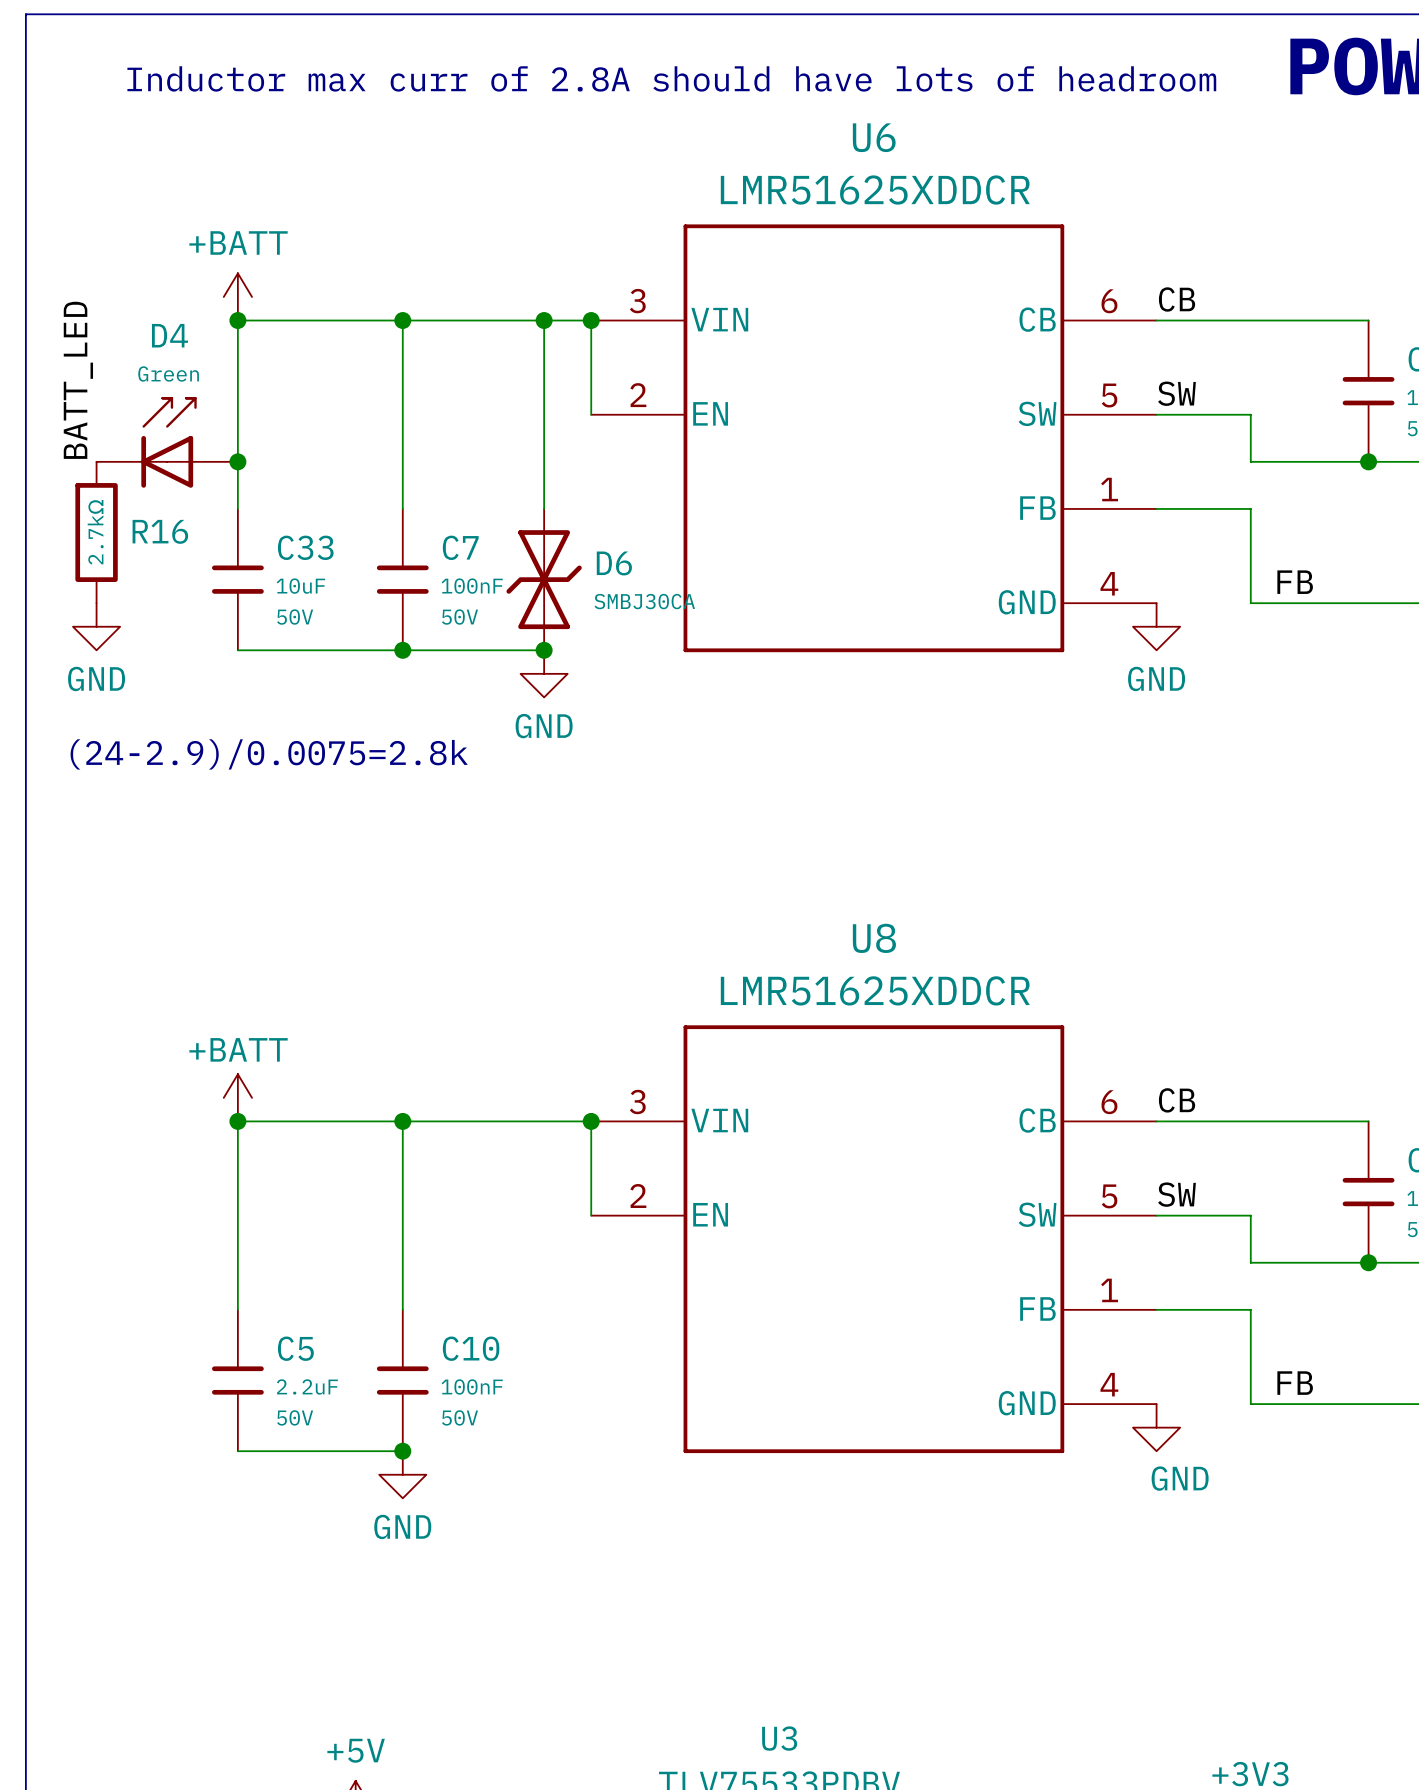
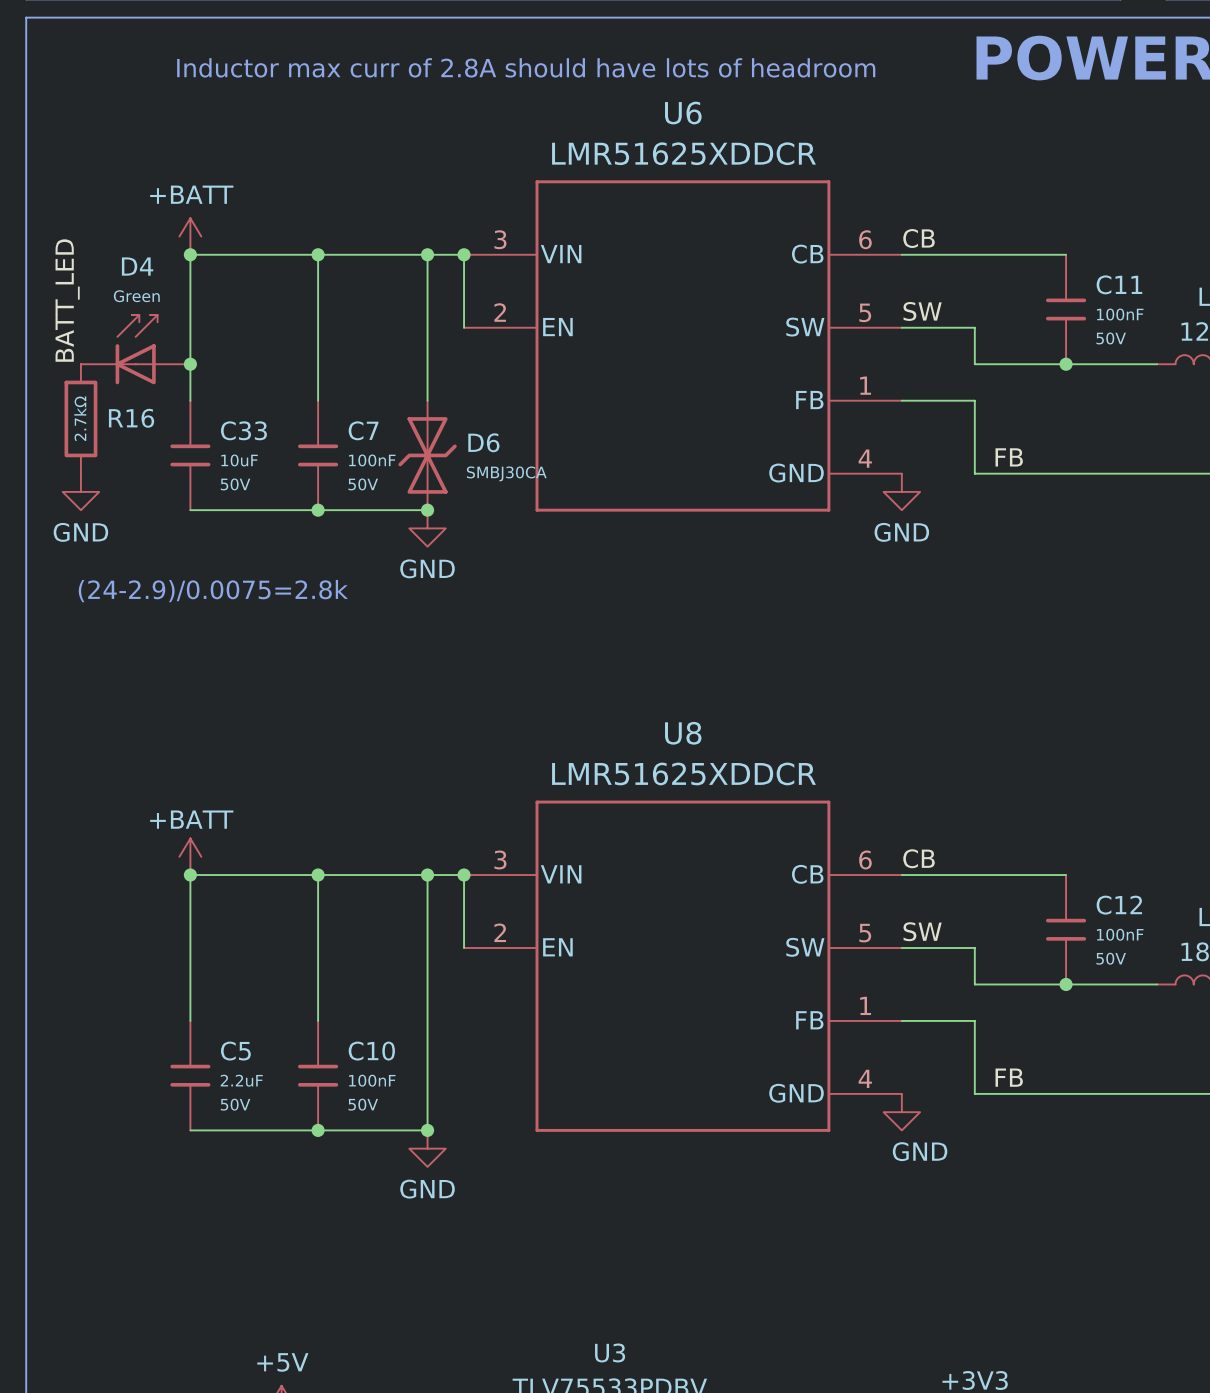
wire: none -> (427, 875) (427, 1130) (318, 1130)
junction: none -> (427, 875)
junction: none -> (427, 1130)
power symbol position: GND (402, 1474) -> GND (427, 1148)

